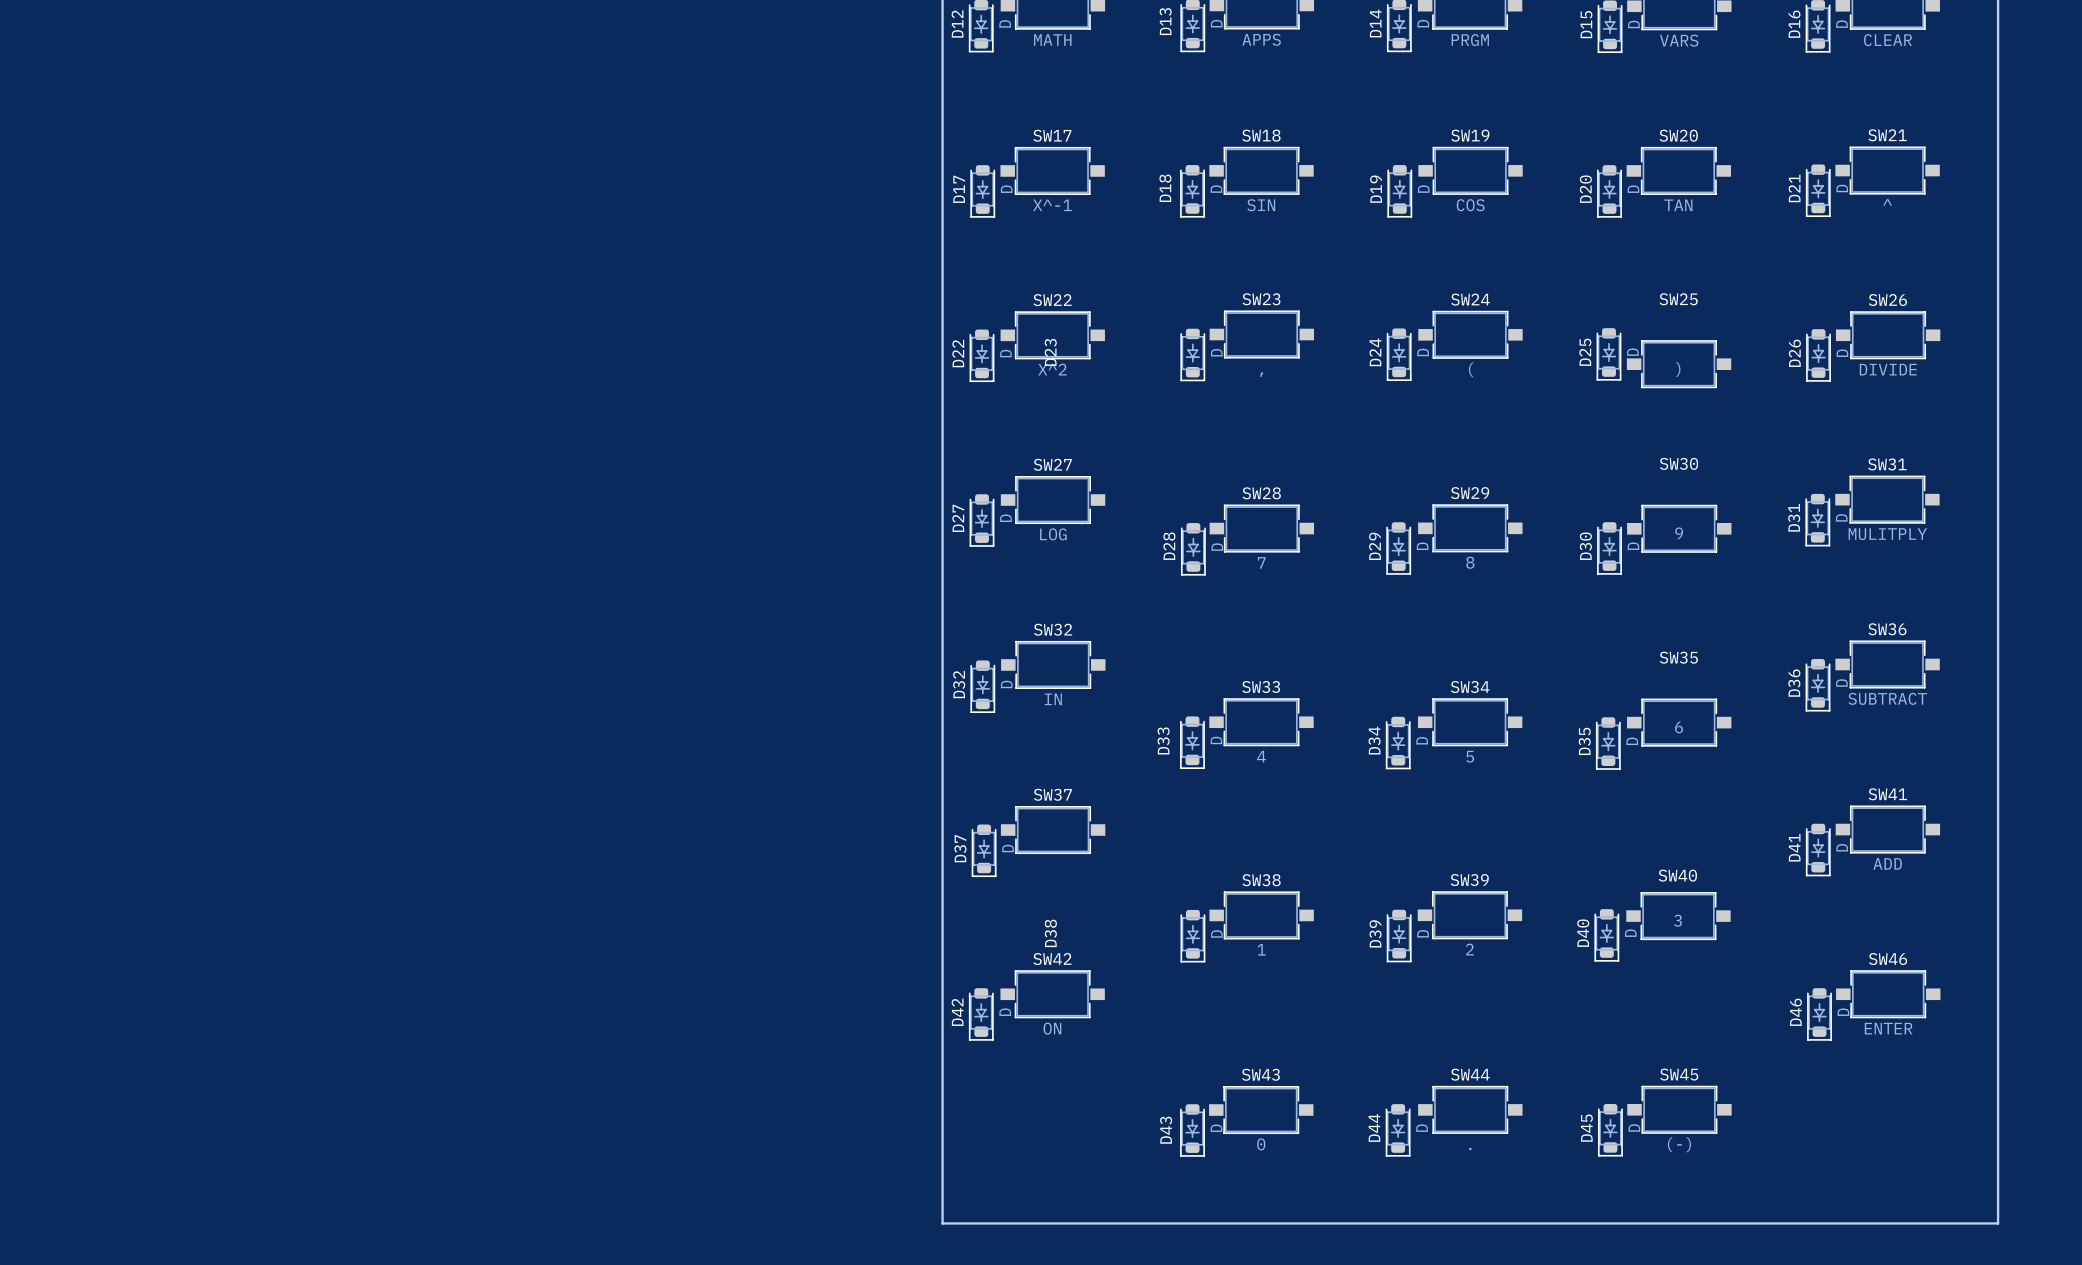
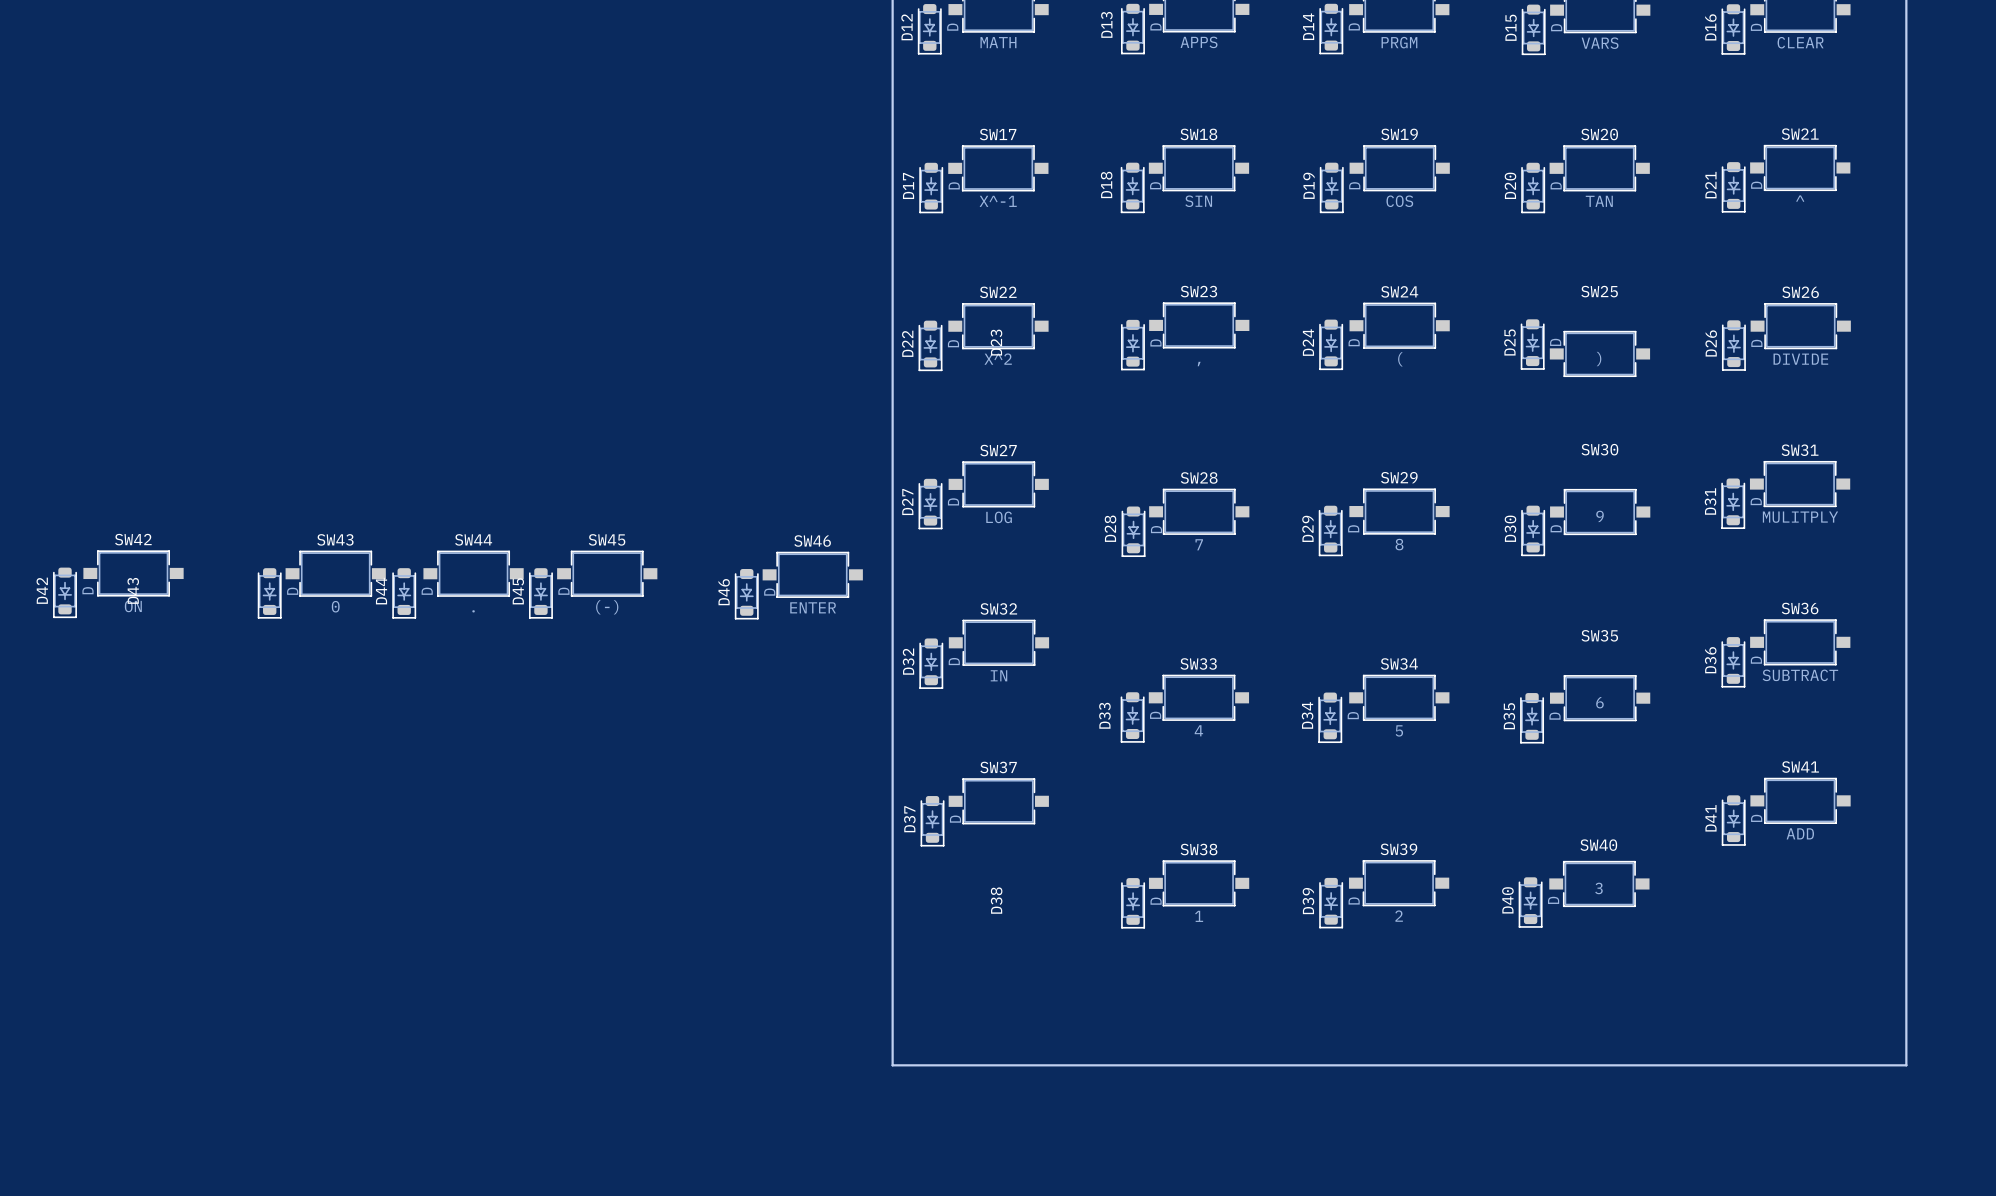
SW42 position: (1052, 994) -> (133, 573)
SW46 position: (1888, 994) -> (812, 574)
D42 position: (981, 1014) -> (65, 592)
D46 position: (1819, 1014) -> (746, 594)
board edge: (942, 1104) (942, 1223) (1998, 1223) (1998, 1104) -> (892, 1065) (1906, 1065)
SW44 position: (1470, 1109) -> (473, 573)
SW45 position: (1679, 1109) -> (607, 573)
SW43 position: (1261, 1110) -> (335, 573)
D43 name position: D43 (1166, 1130) -> D43 (133, 590)
D43 position: (1192, 1130) -> (269, 593)
D44 position: (1398, 1130) -> (404, 593)
D45 position: (1610, 1130) -> (540, 593)

